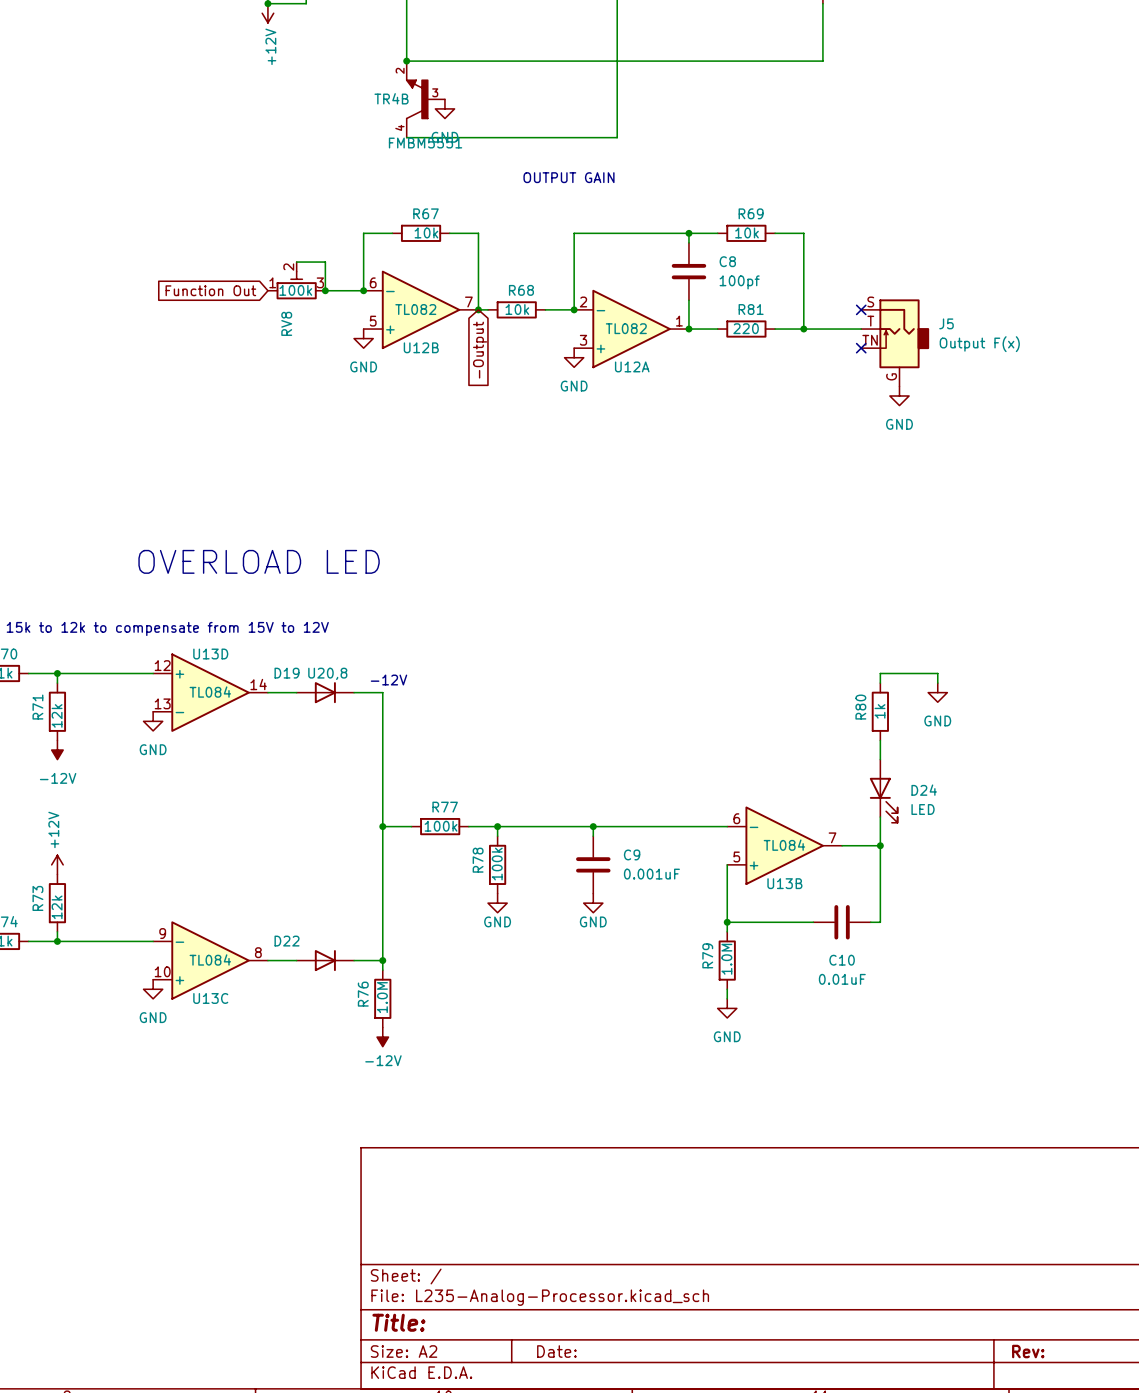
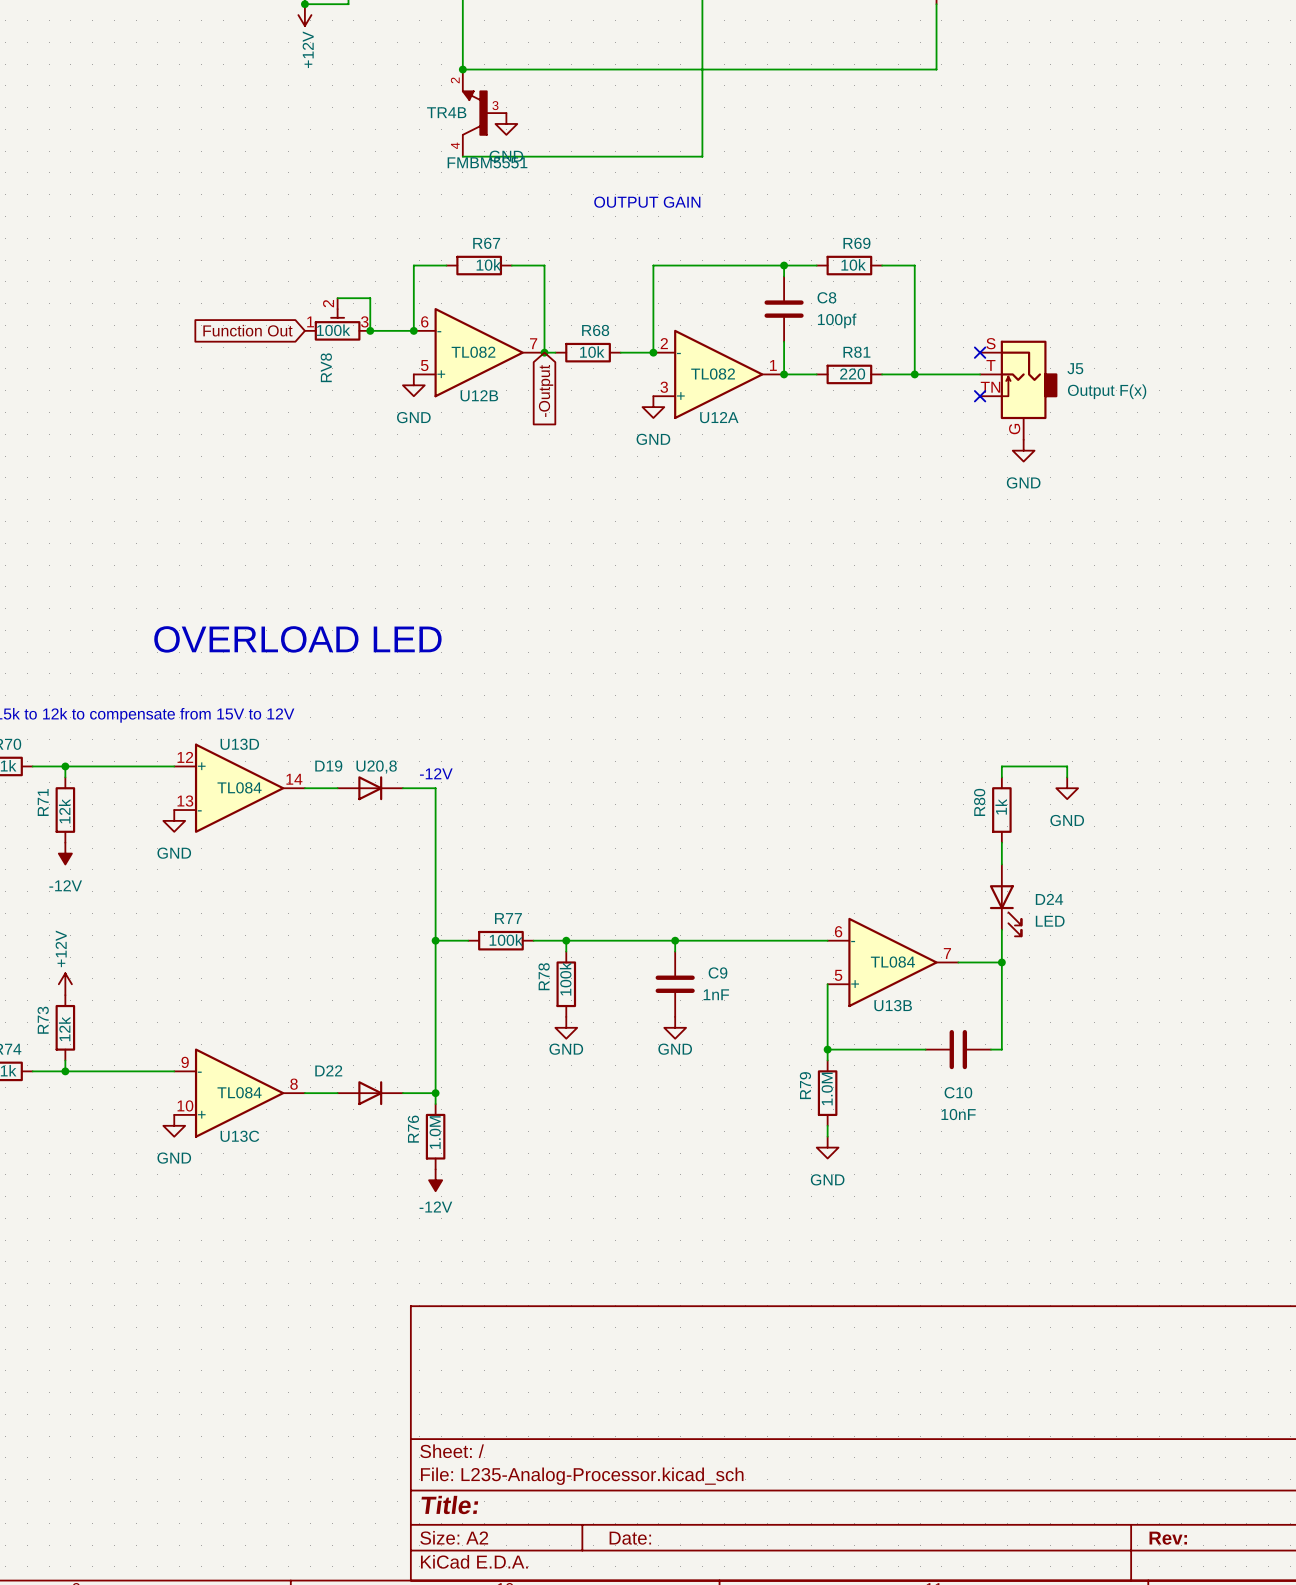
C9 value: 0.001uF (651, 874) -> 1nF (716, 994)
C10 value: 0.01uF (842, 979) -> 10nF (958, 1114)

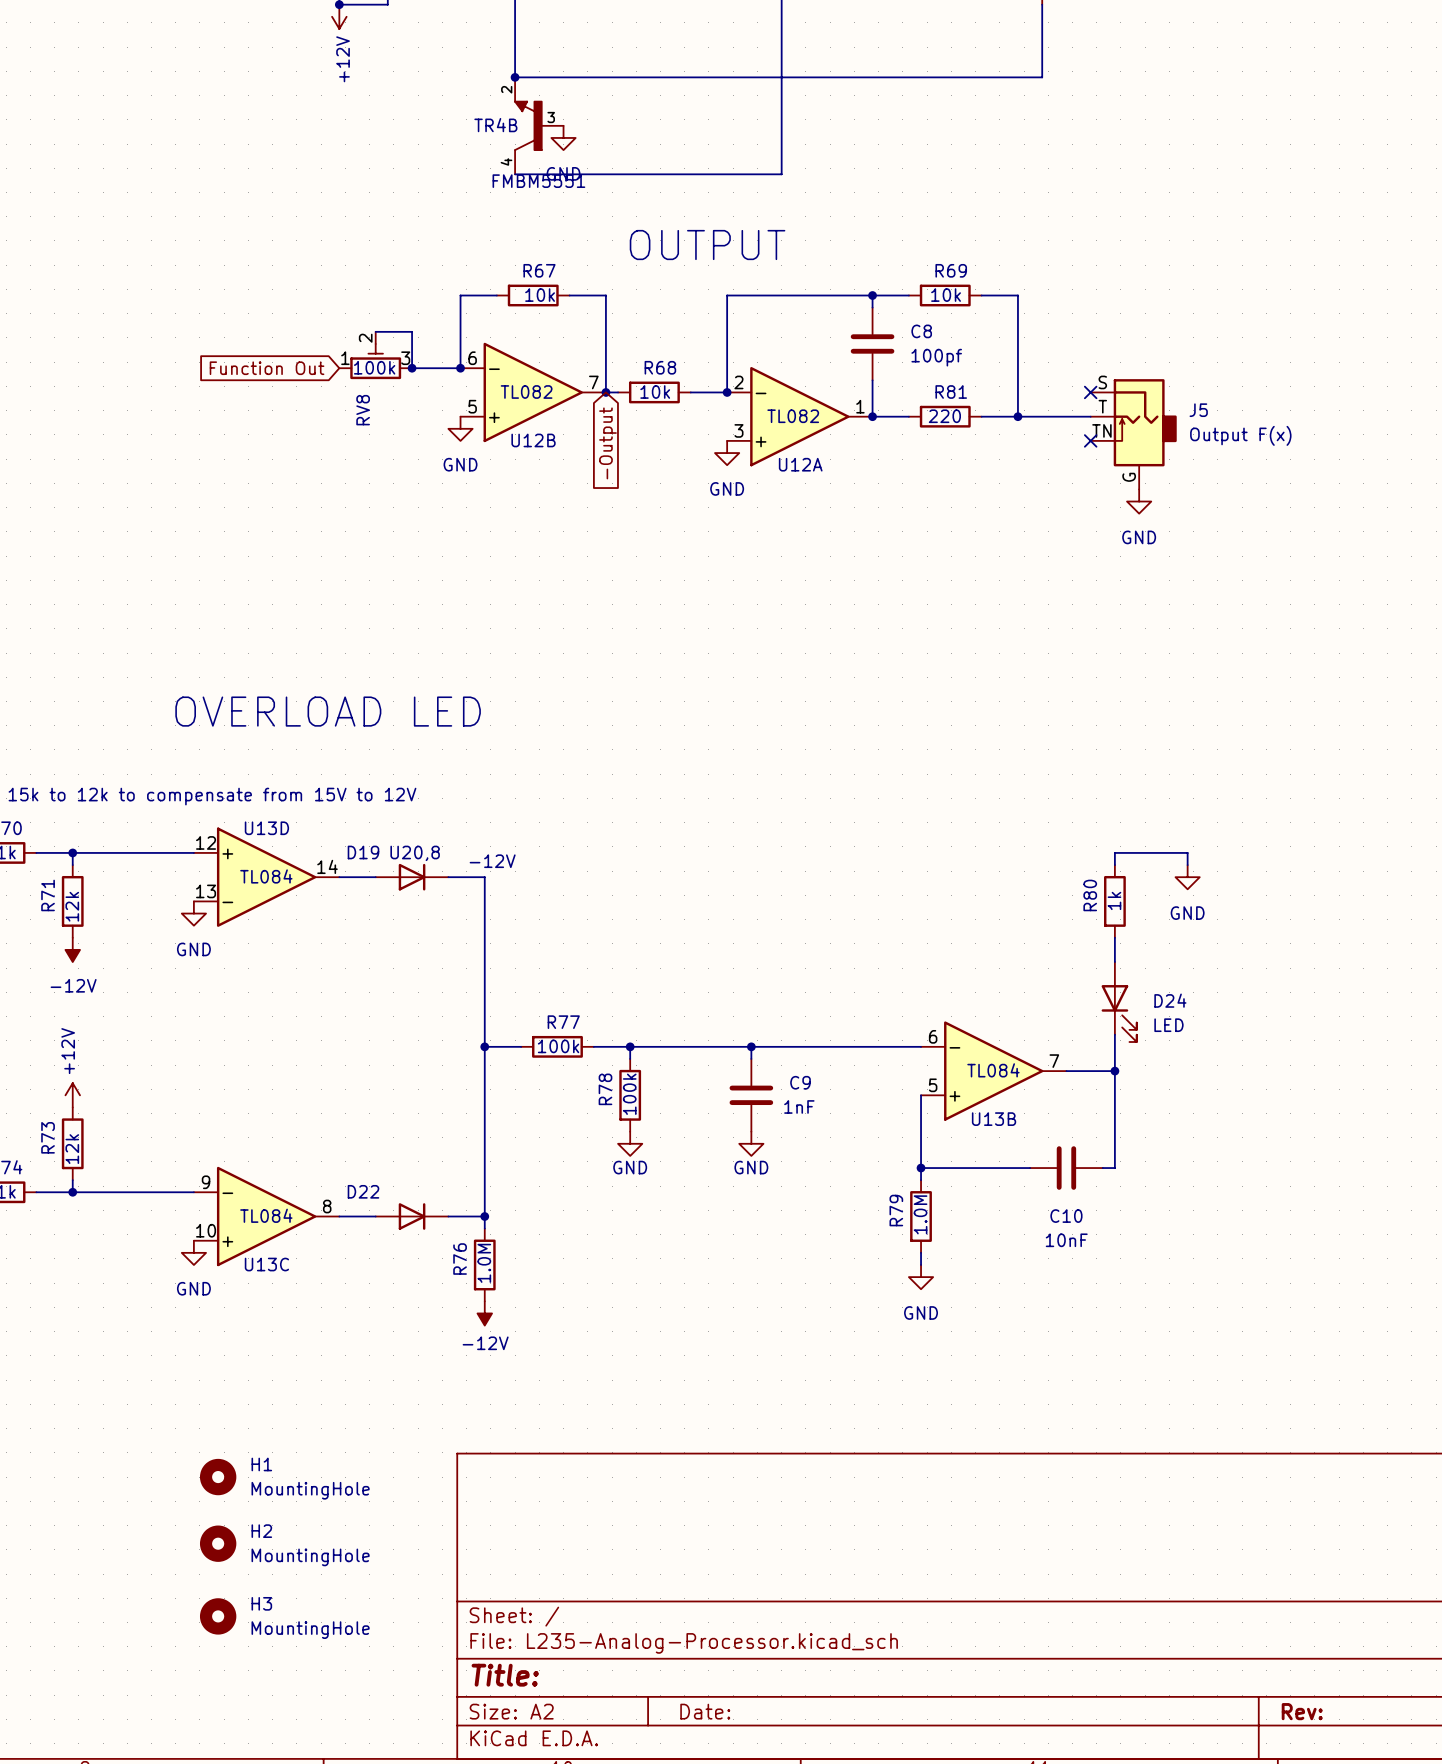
text: OUTPUT GAIN (647, 202) -> OUTPUT (707, 245)
H1: none -> MountingHole (218, 1477)
H2: none -> MountingHole (218, 1543)
H3: none -> MountingHole (218, 1616)

